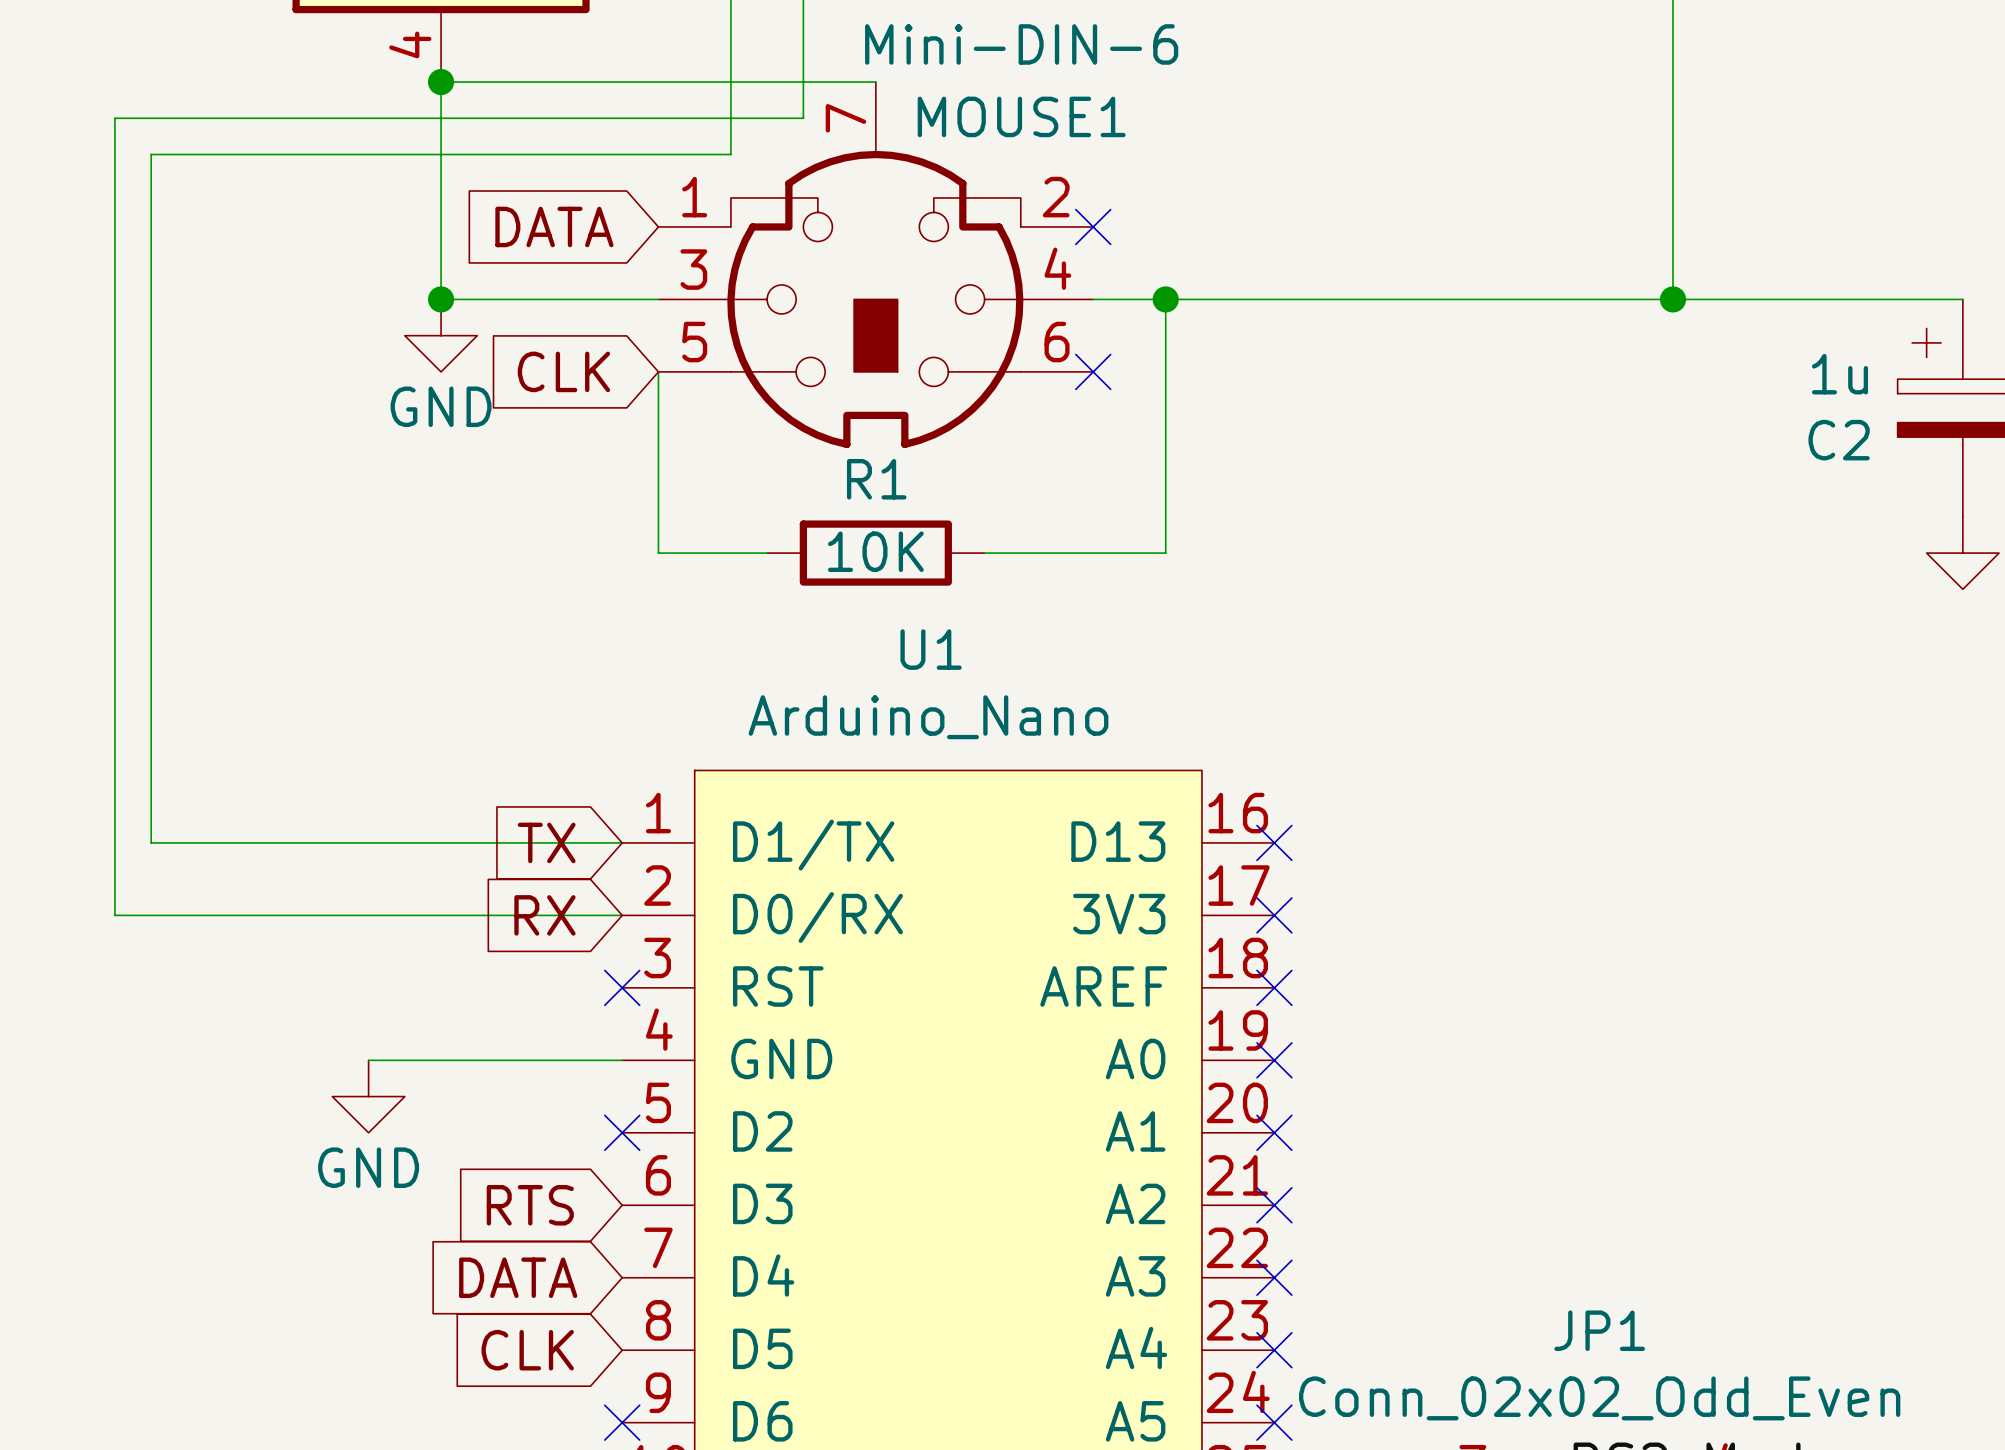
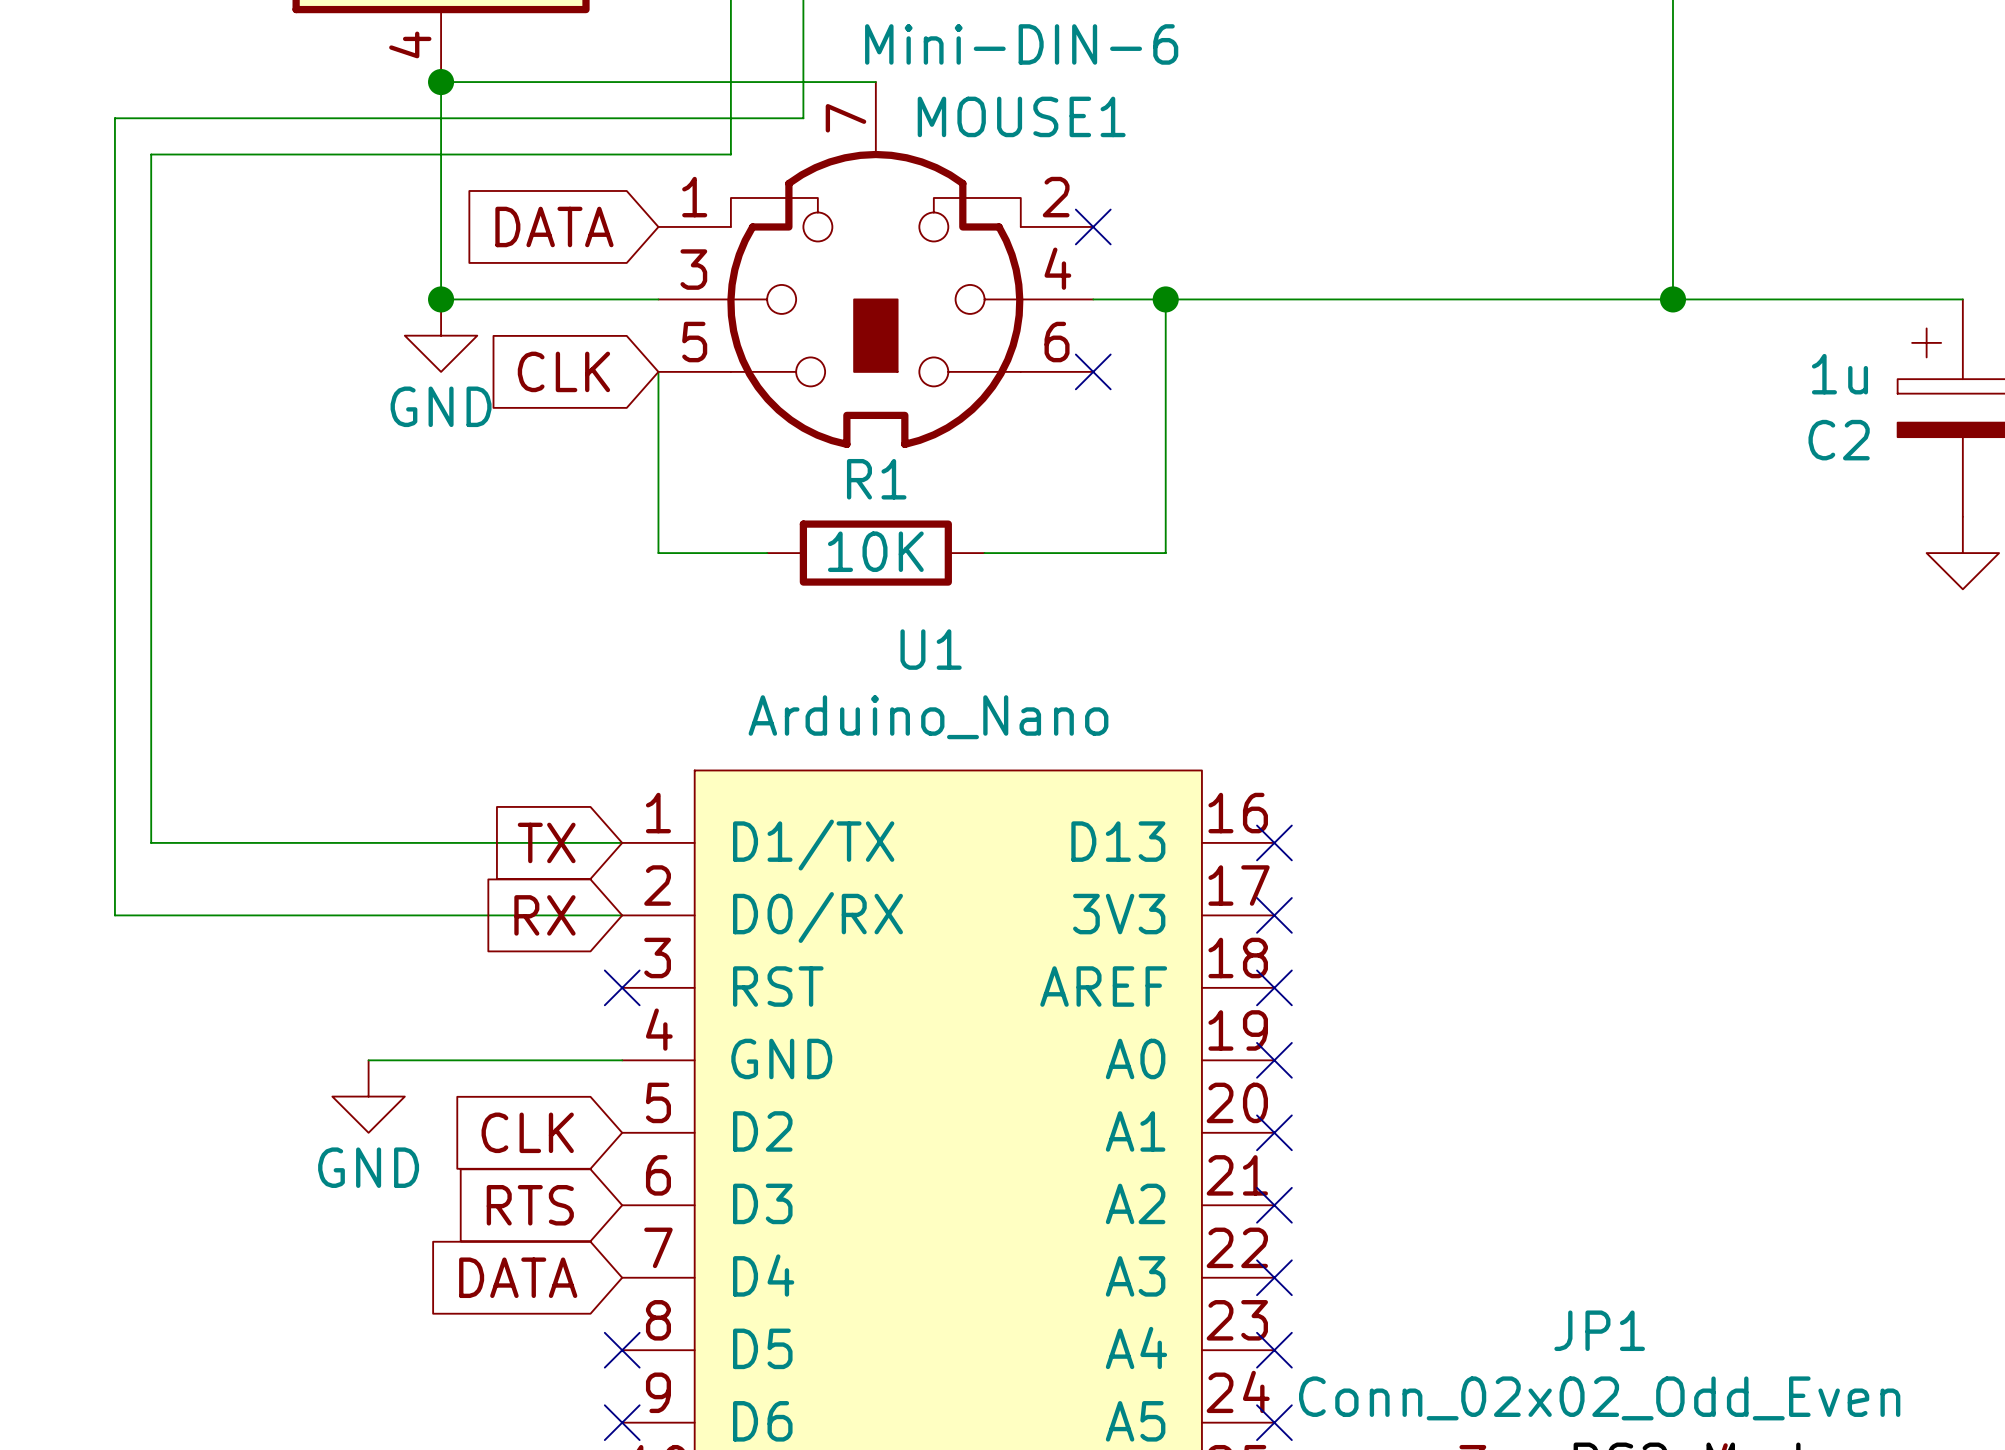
no-connect mark: (622, 1132) -> none
global label position: CLK (527, 1350) -> CLK (527, 1132)
no-connect mark: none -> (622, 1350)

